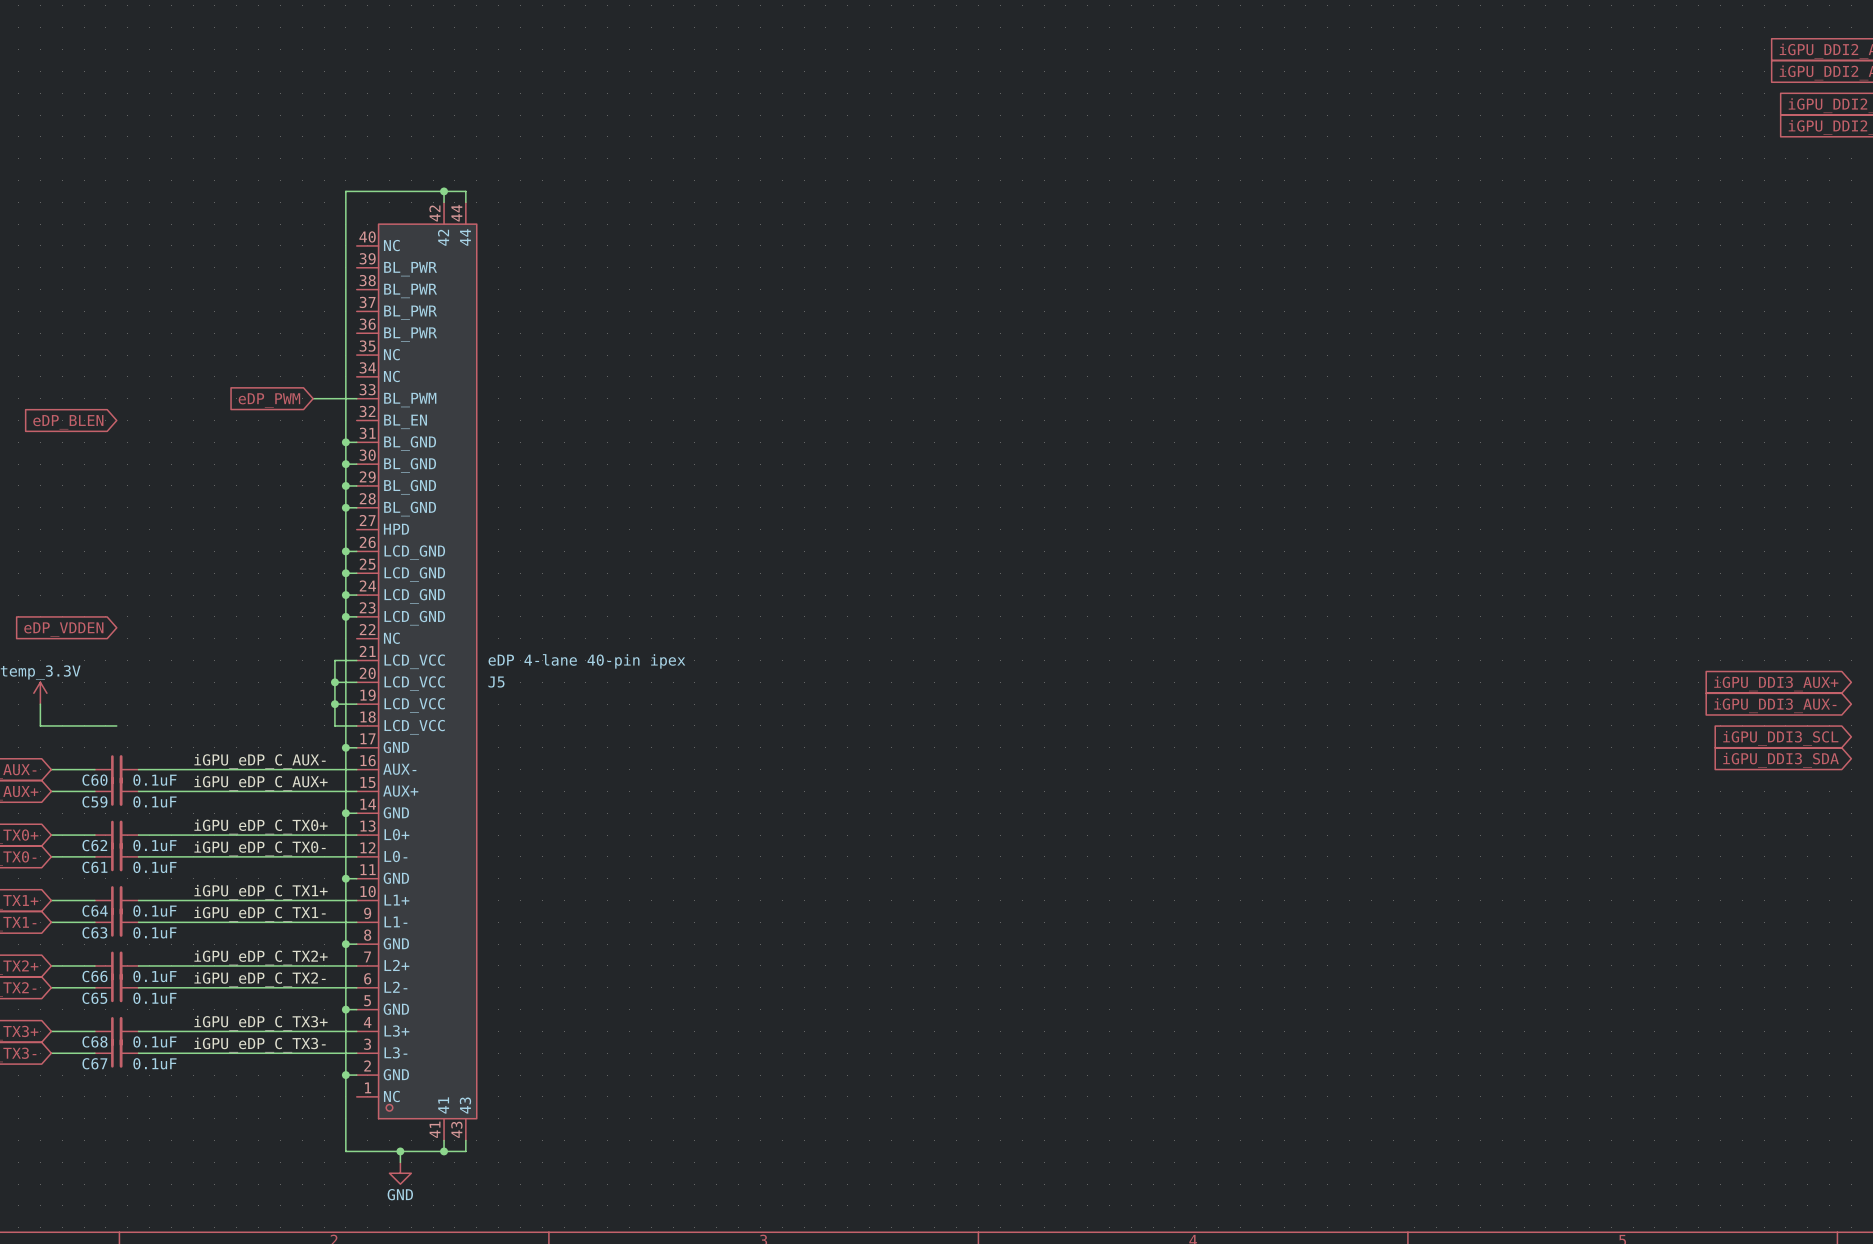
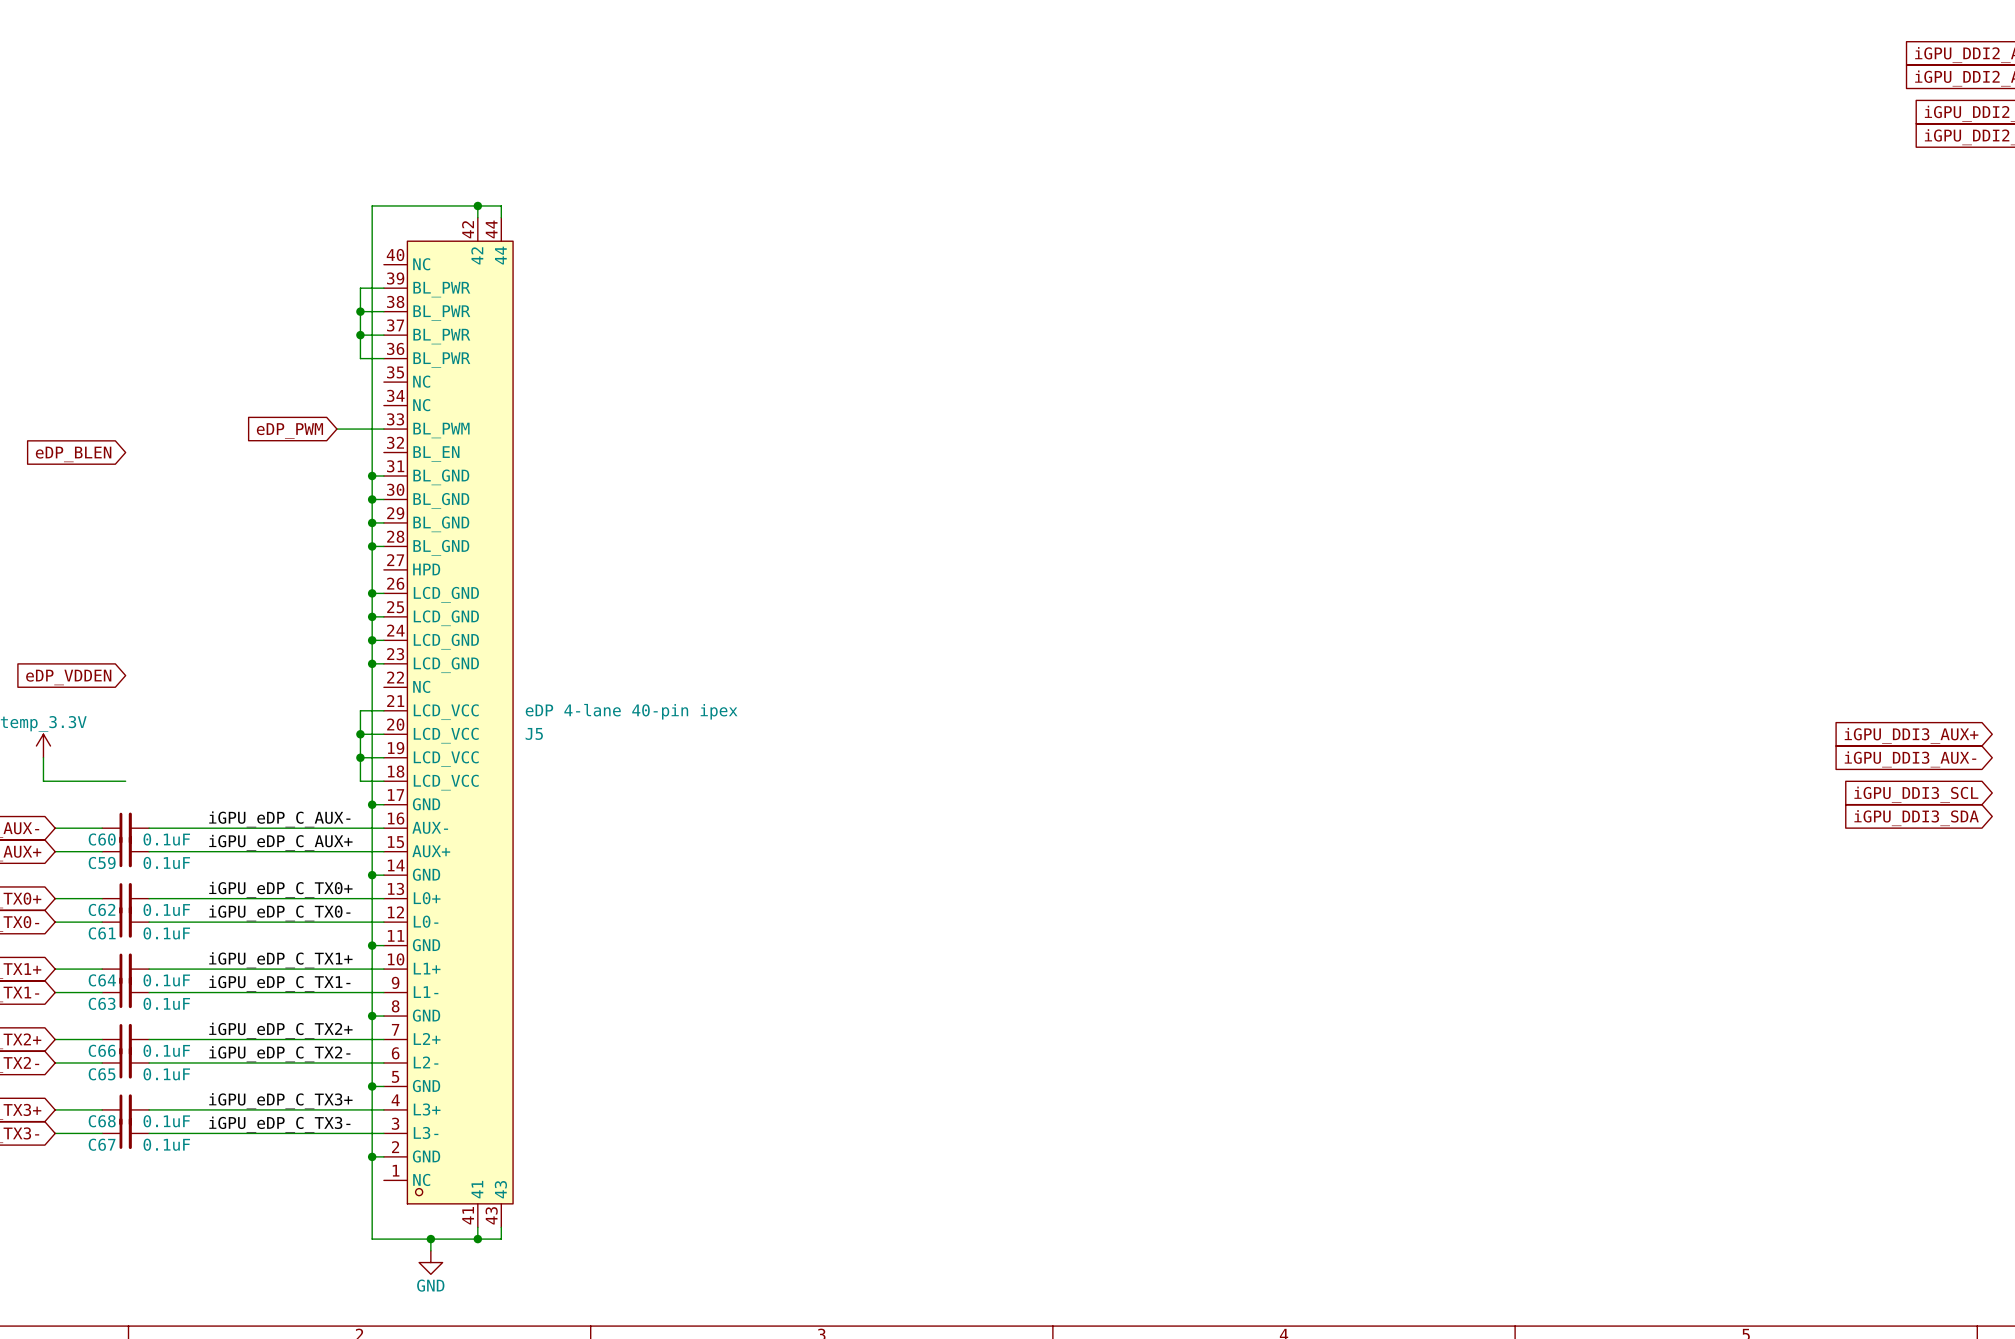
wire: none -> (383, 288) (360, 288) (360, 358) (383, 358)
wire: none -> (360, 311) (383, 311)
junction: none -> (360, 311)
wire: none -> (360, 335) (383, 335)
junction: none -> (360, 335)

